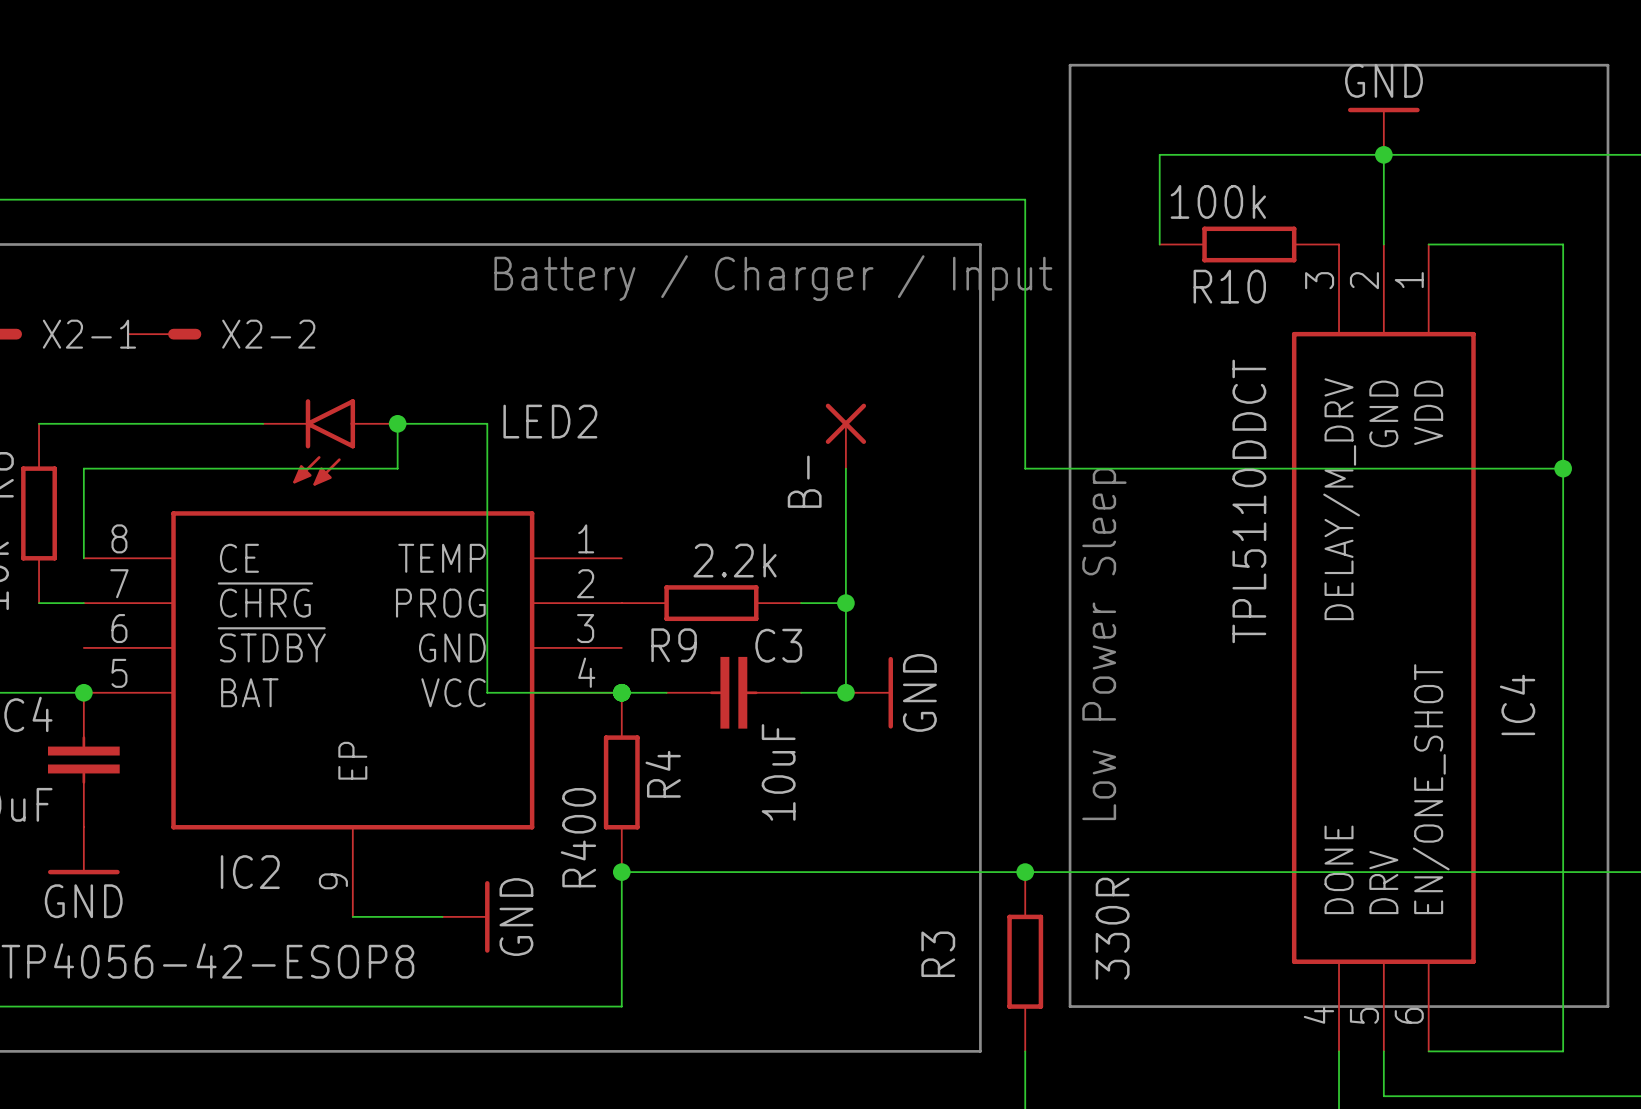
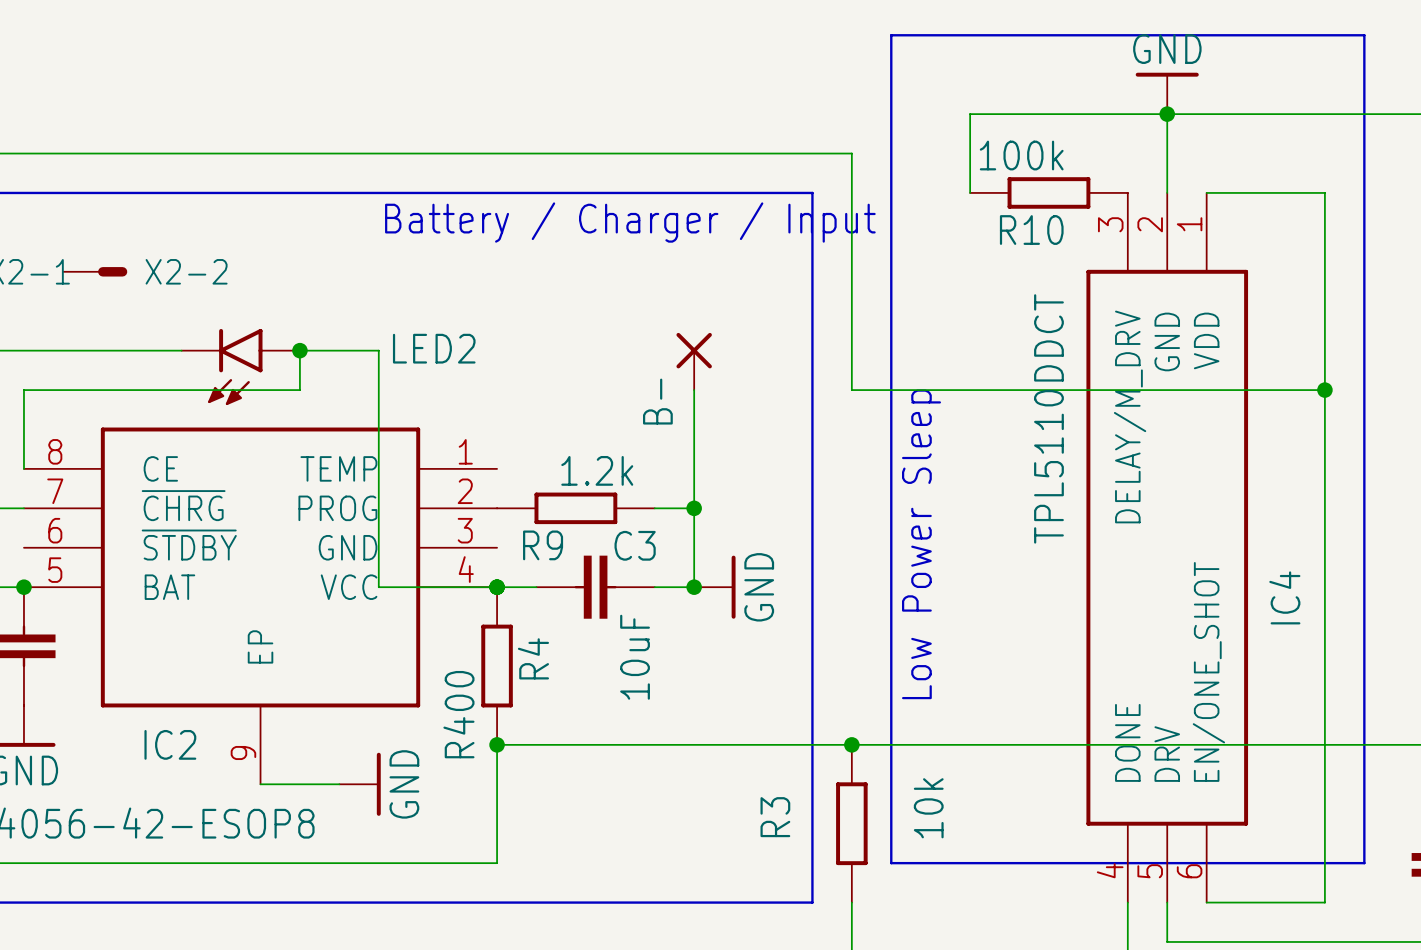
R9 value: 2.2k (735, 560) -> 1.2k (597, 470)
R3 value: 330R (1112, 928) -> 10k (928, 808)

